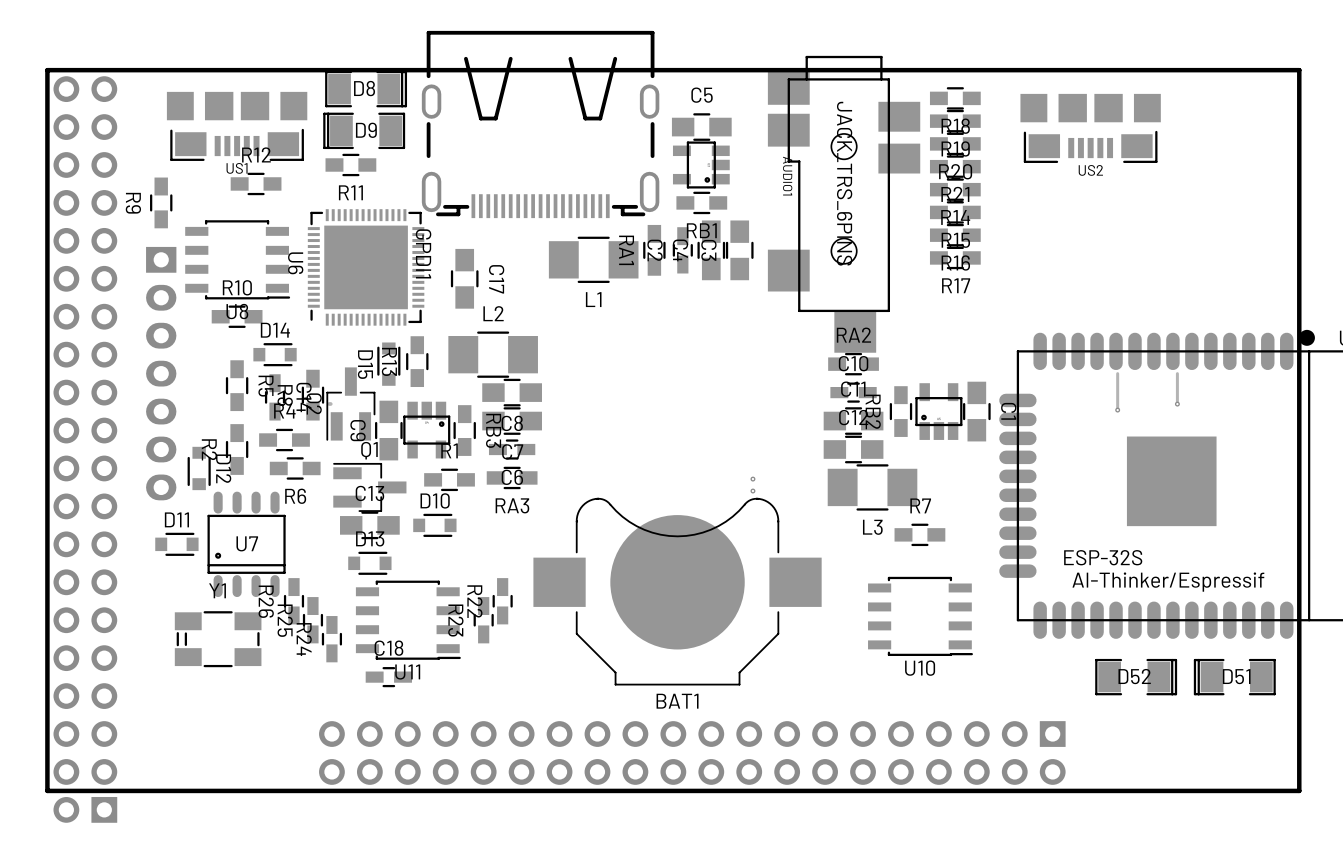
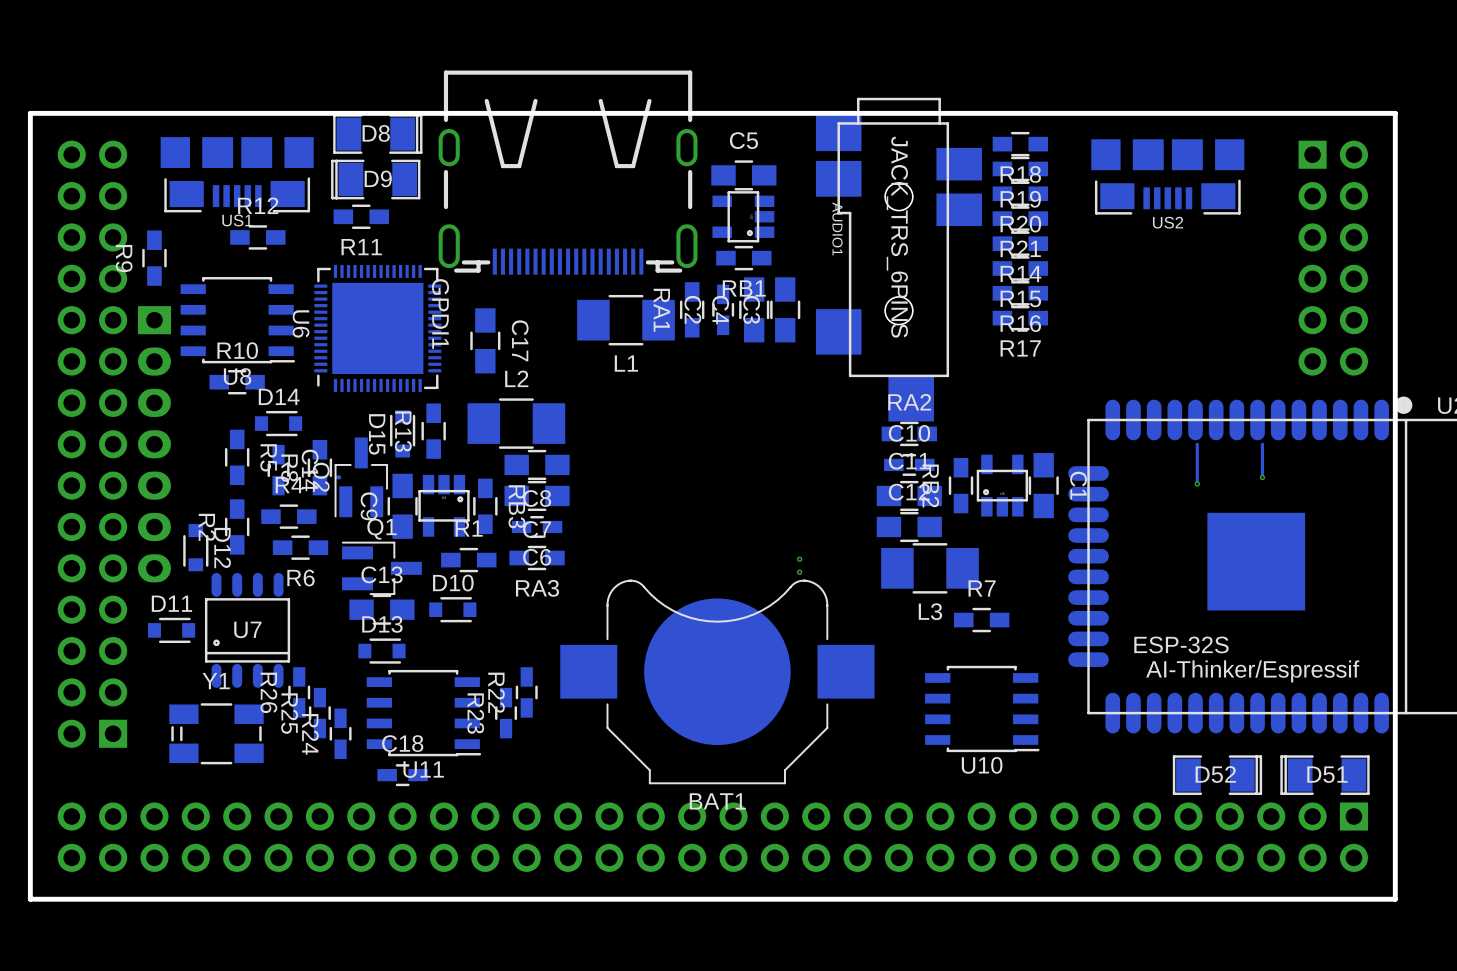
part: none -> (1333, 258)
part: none -> (92, 444)
part: (85, 449) -> none
part: none -> (712, 837)
part: (692, 752) -> none

